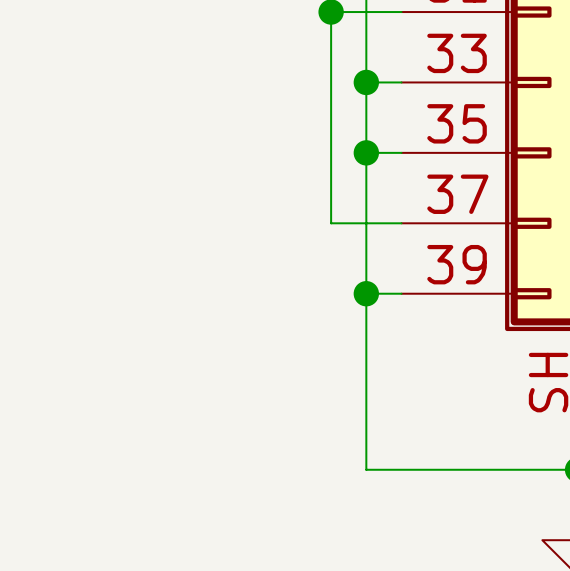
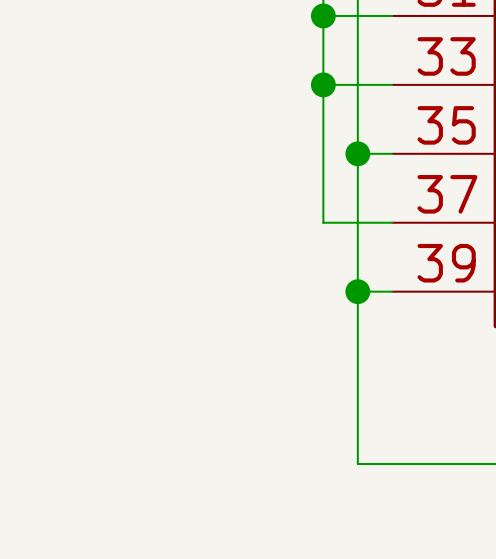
wire: none -> (323, 84) (357, 84)
junction position: (366, 82) -> (323, 84)

